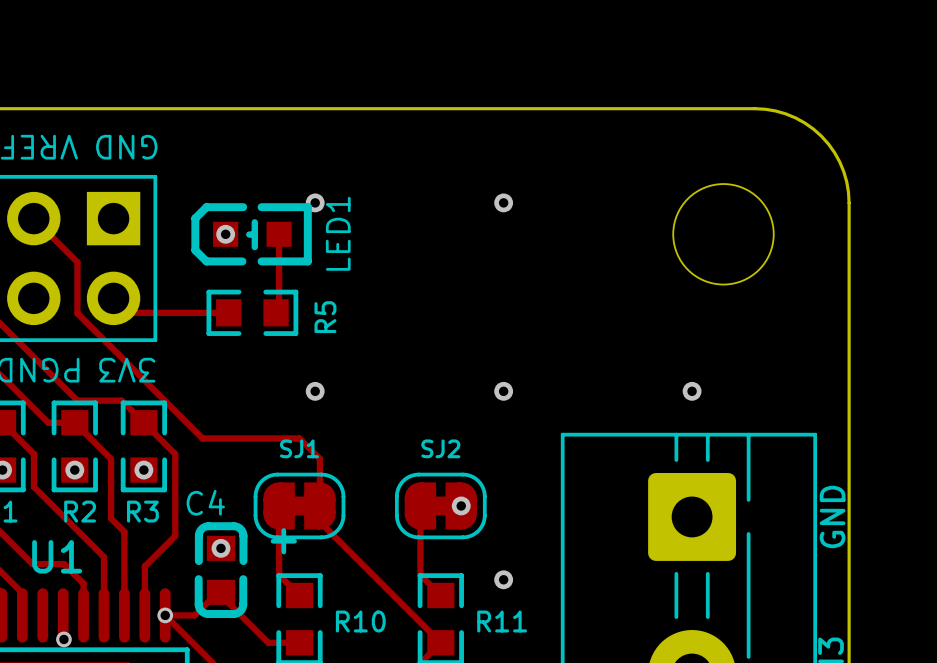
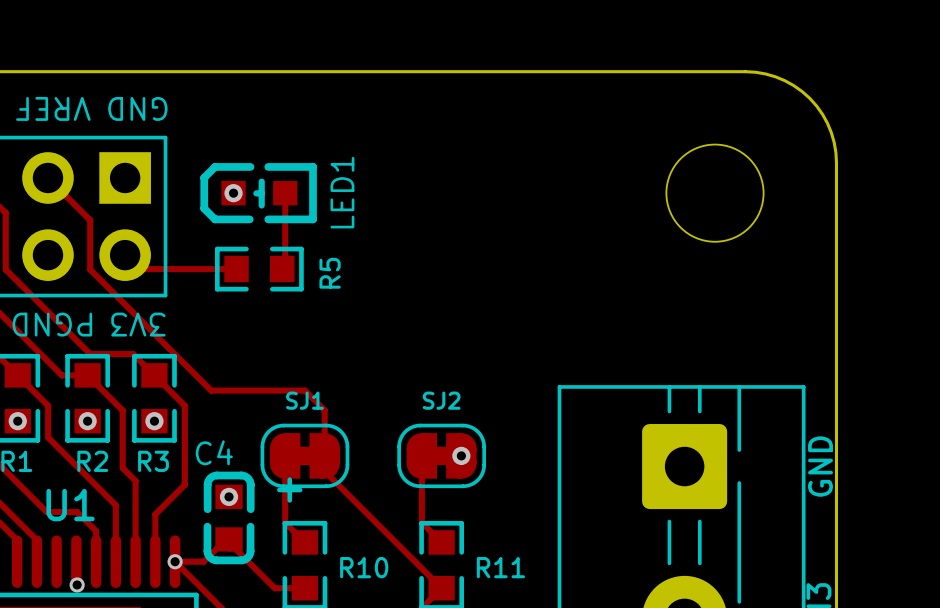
via: (315, 202) -> none
via: (503, 202) -> none
via: (315, 391) -> none
via: (503, 391) -> none
via: (692, 391) -> none
via: (503, 579) -> none

